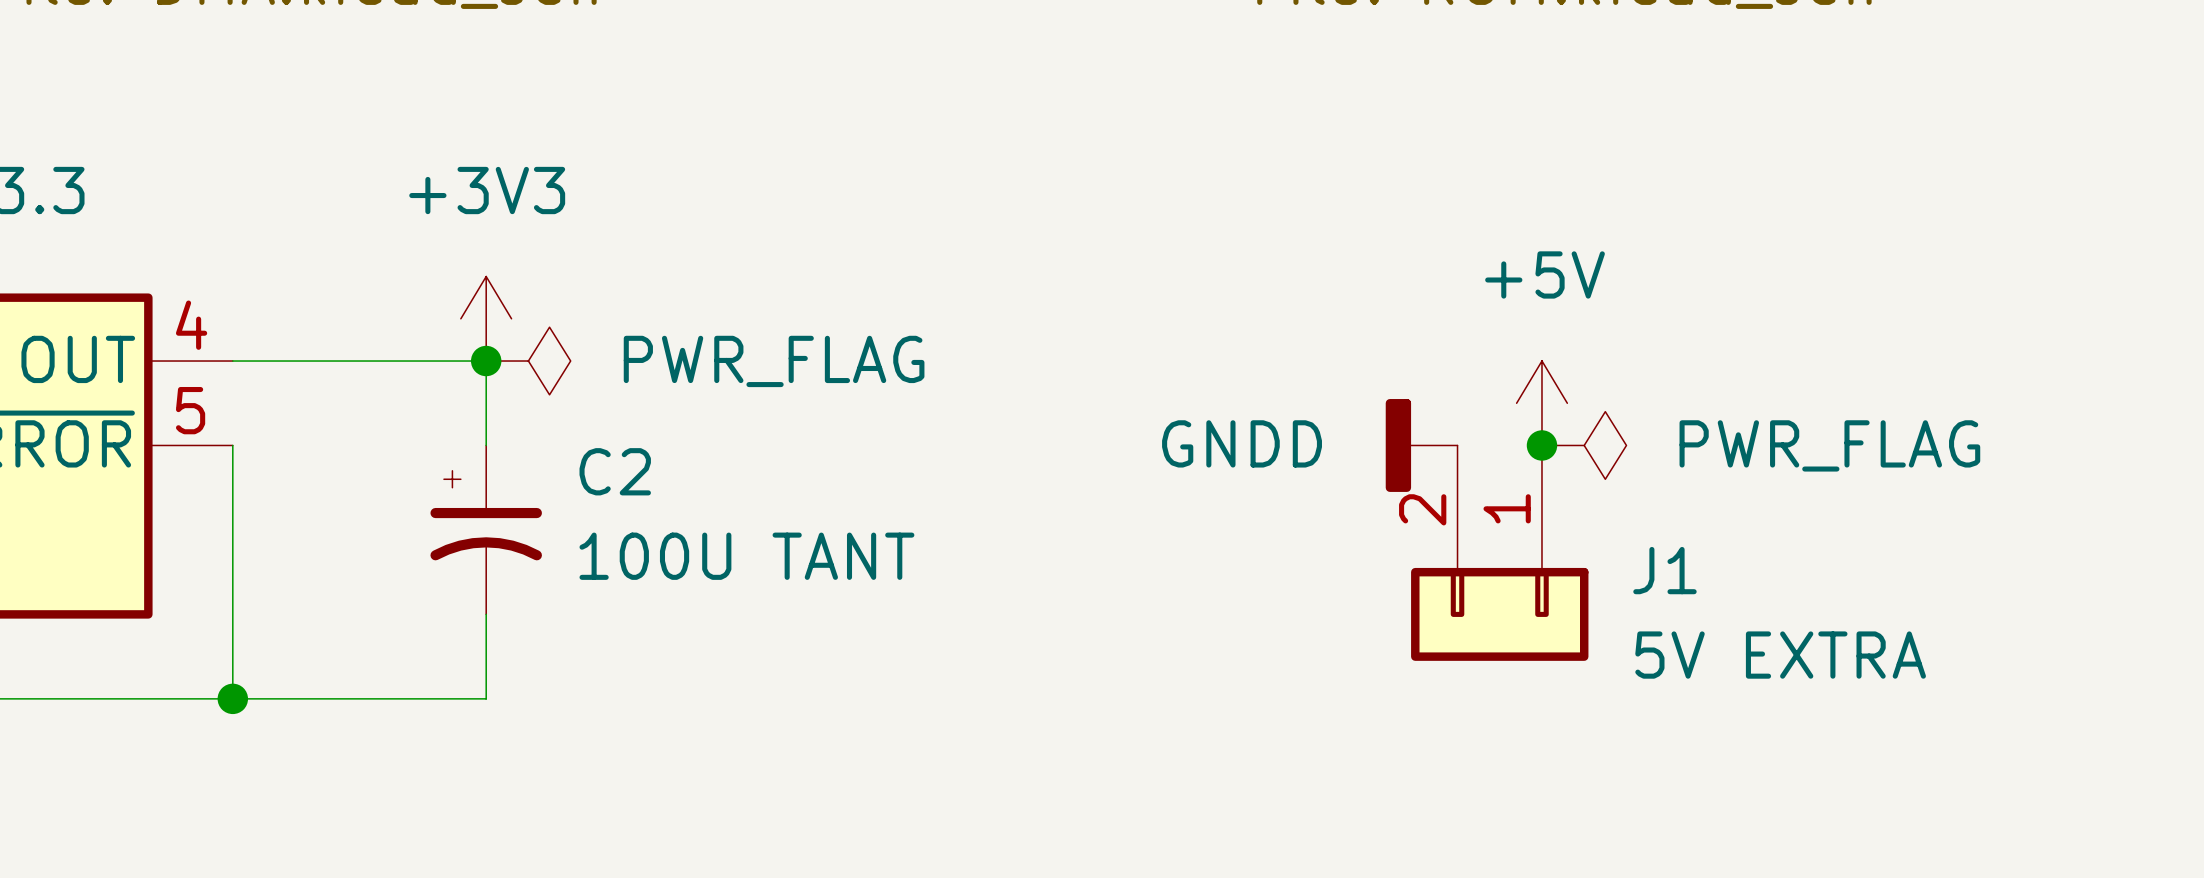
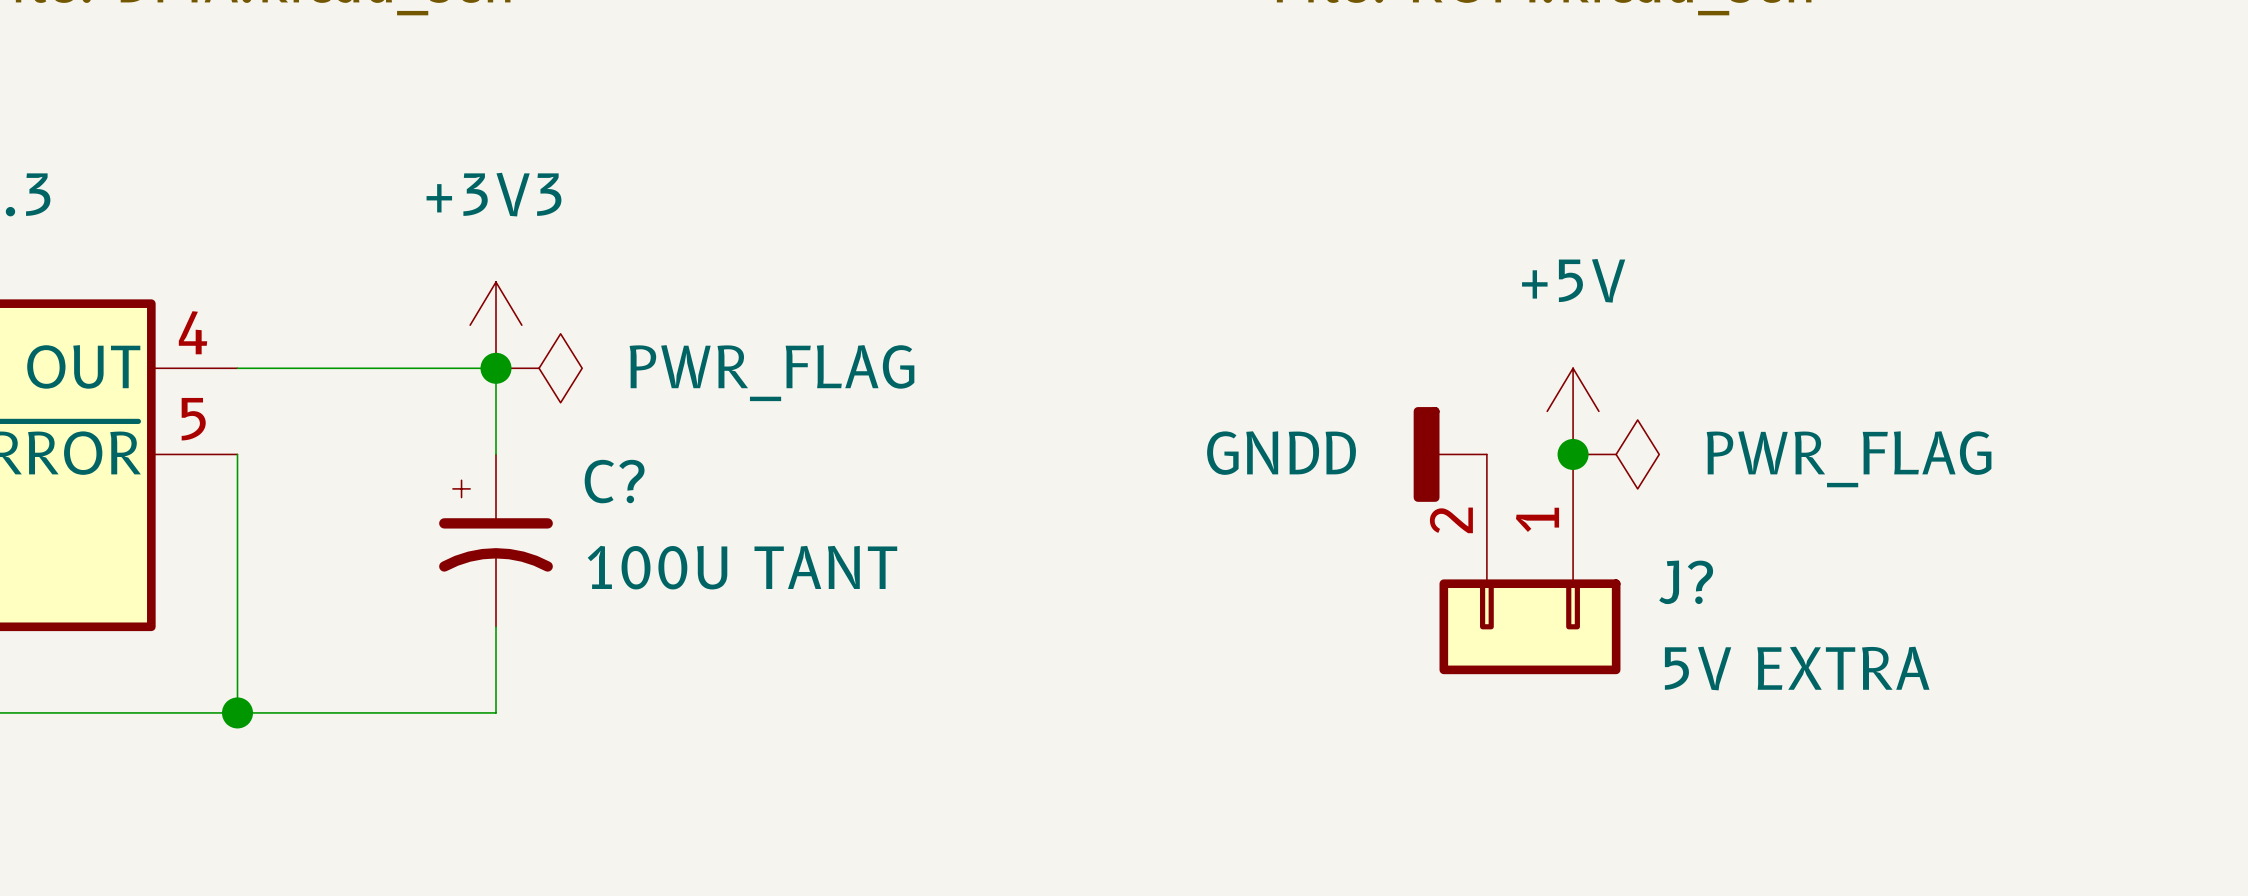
C2 name: C2 (615, 471) -> C? (614, 481)
J1 name: J1 (1664, 570) -> J? (1686, 582)

